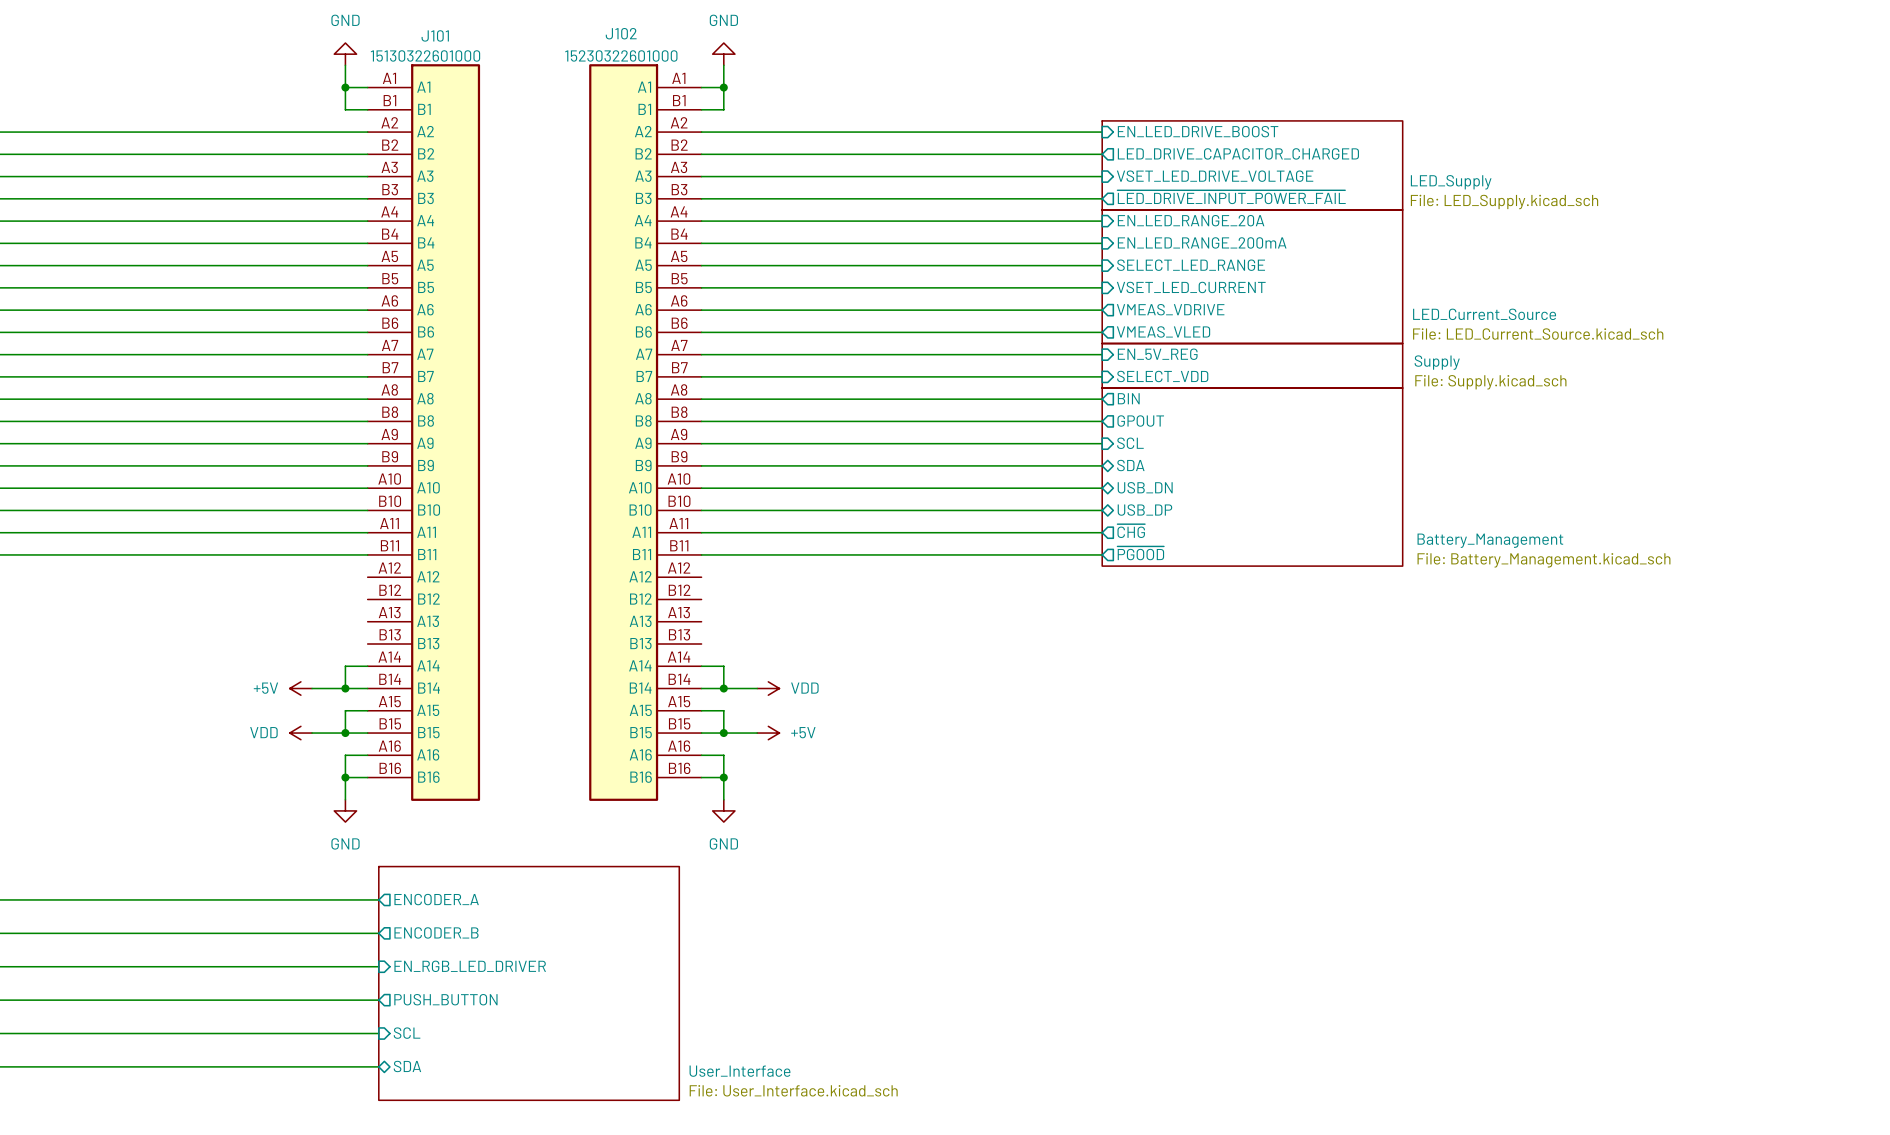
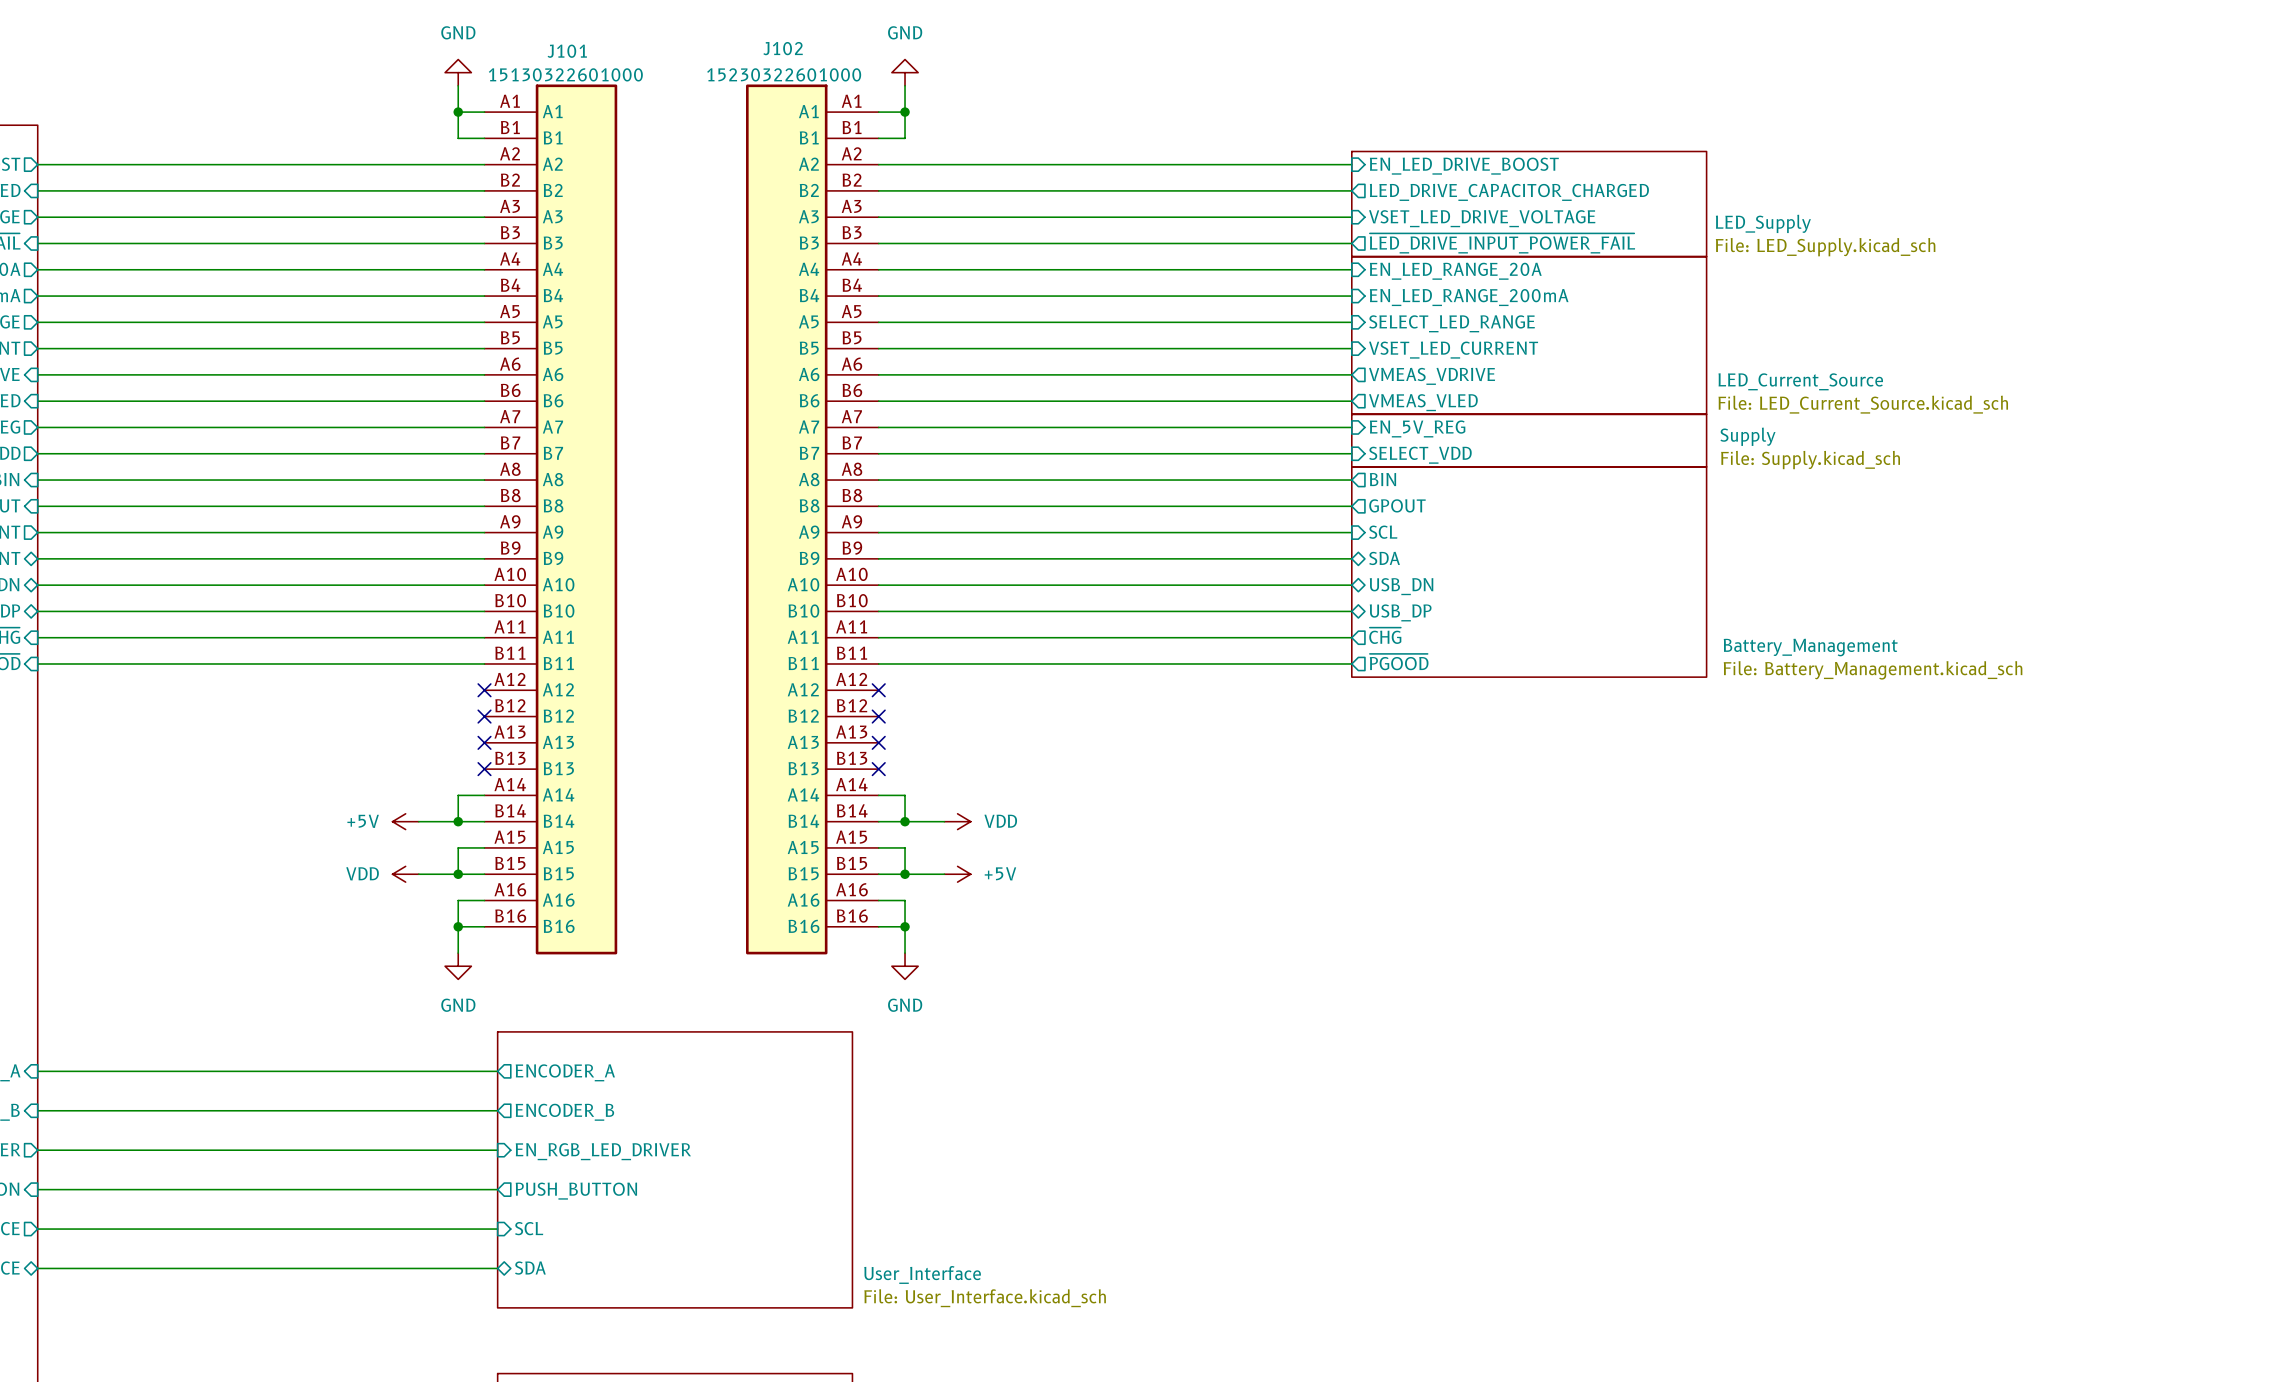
no-connect mark: none -> (484, 690)
no-connect mark: none -> (878, 690)
no-connect mark: none -> (484, 716)
no-connect mark: none -> (878, 716)
no-connect mark: none -> (484, 742)
no-connect mark: none -> (878, 742)
no-connect mark: none -> (484, 769)
no-connect mark: none -> (878, 769)

